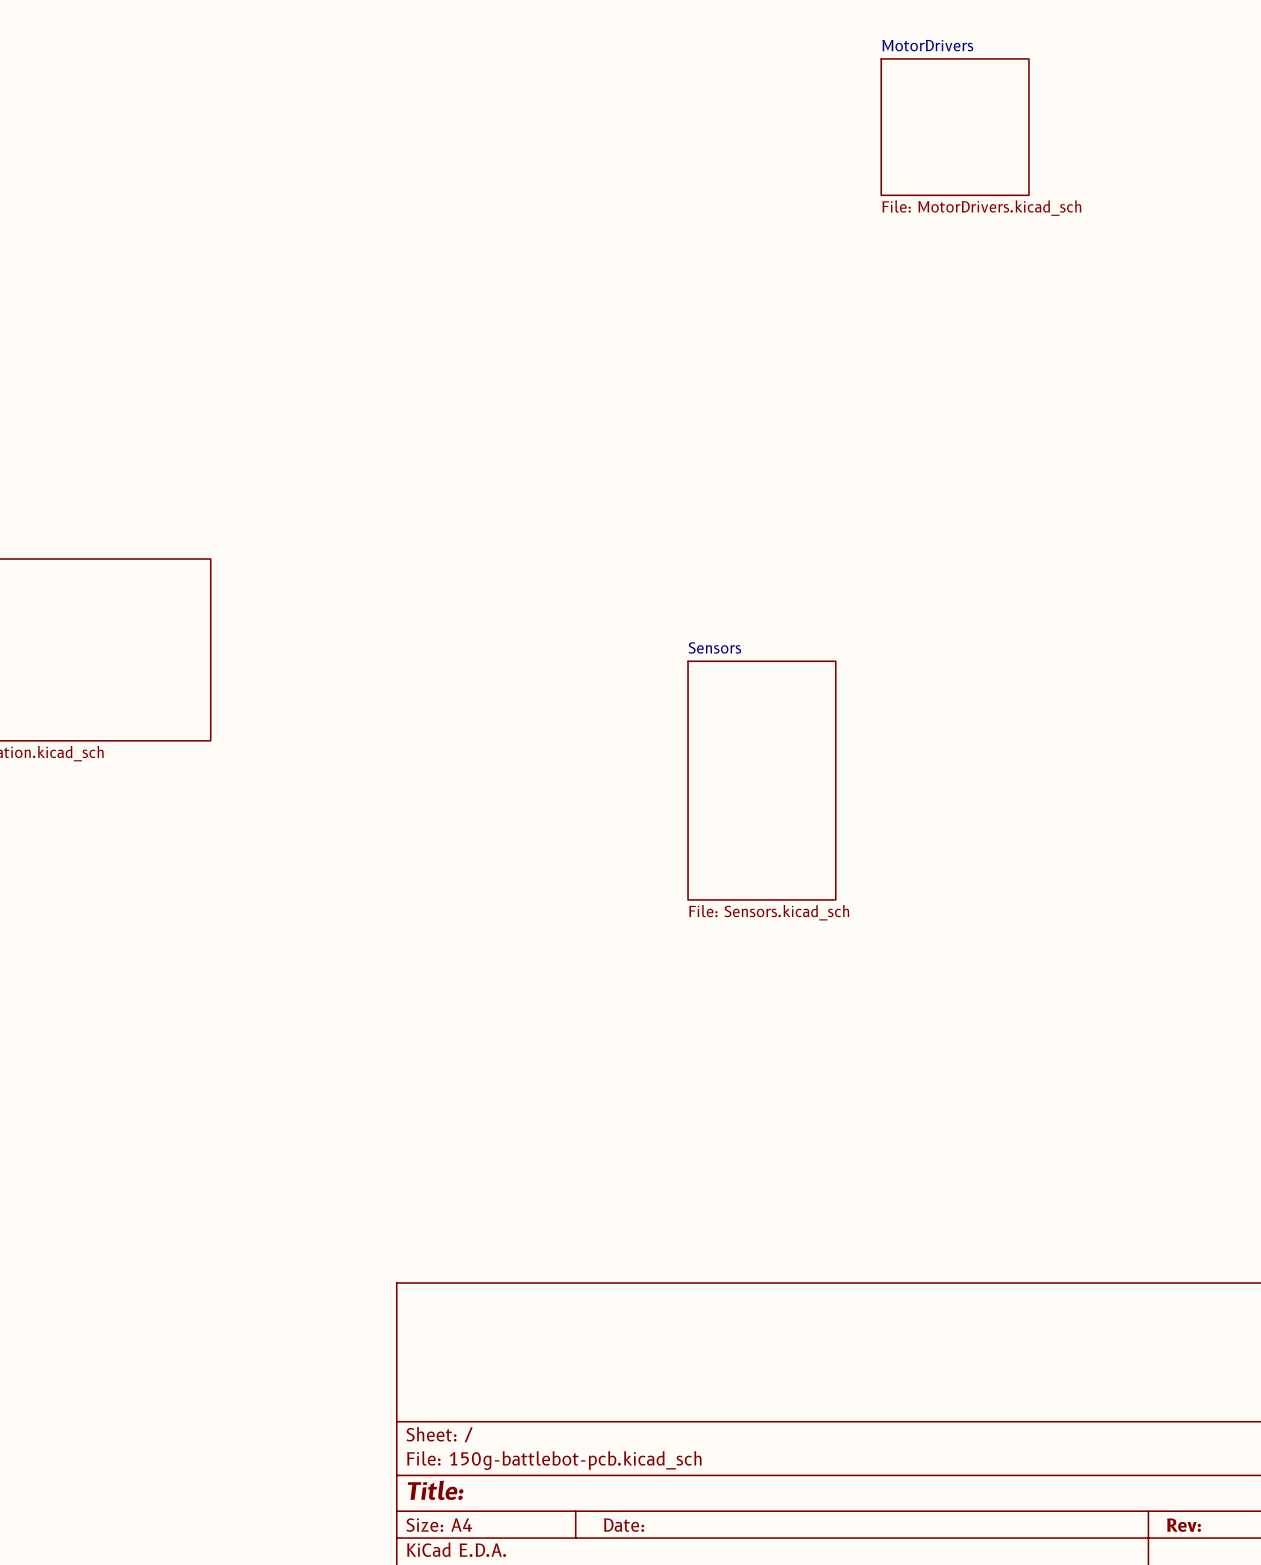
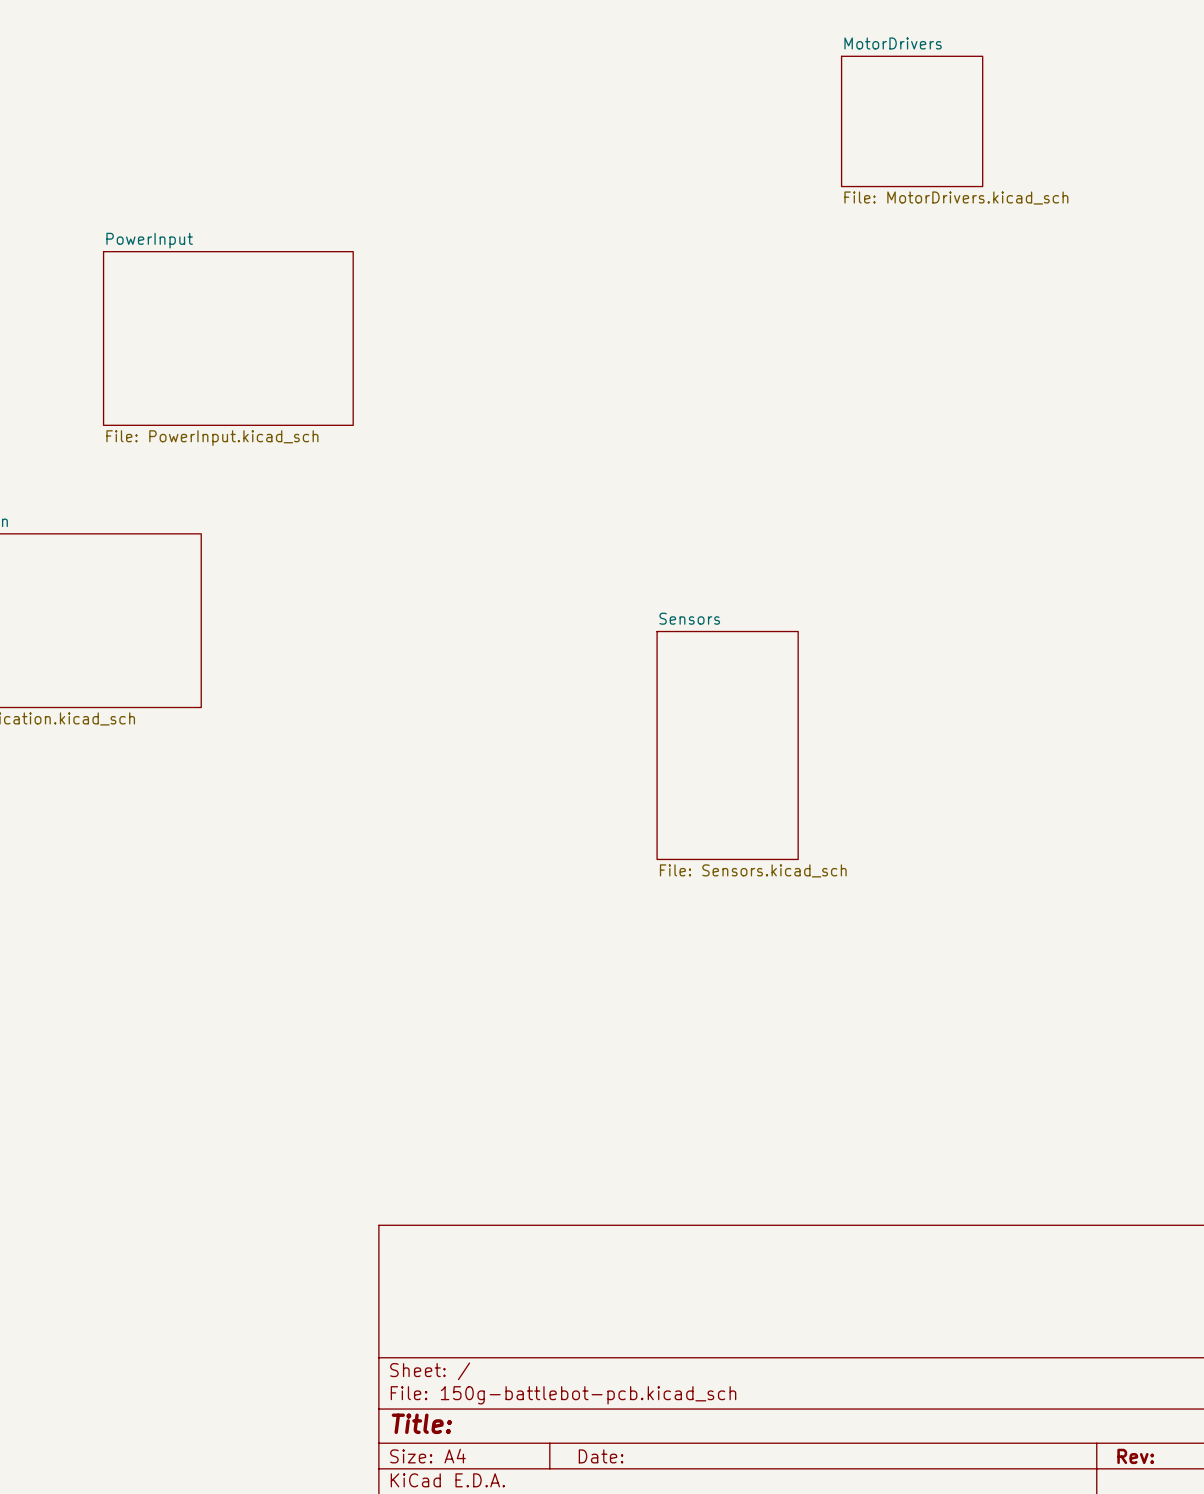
sheet PowerInput: none -> File: PowerInput.kicad_sch (228, 338)

